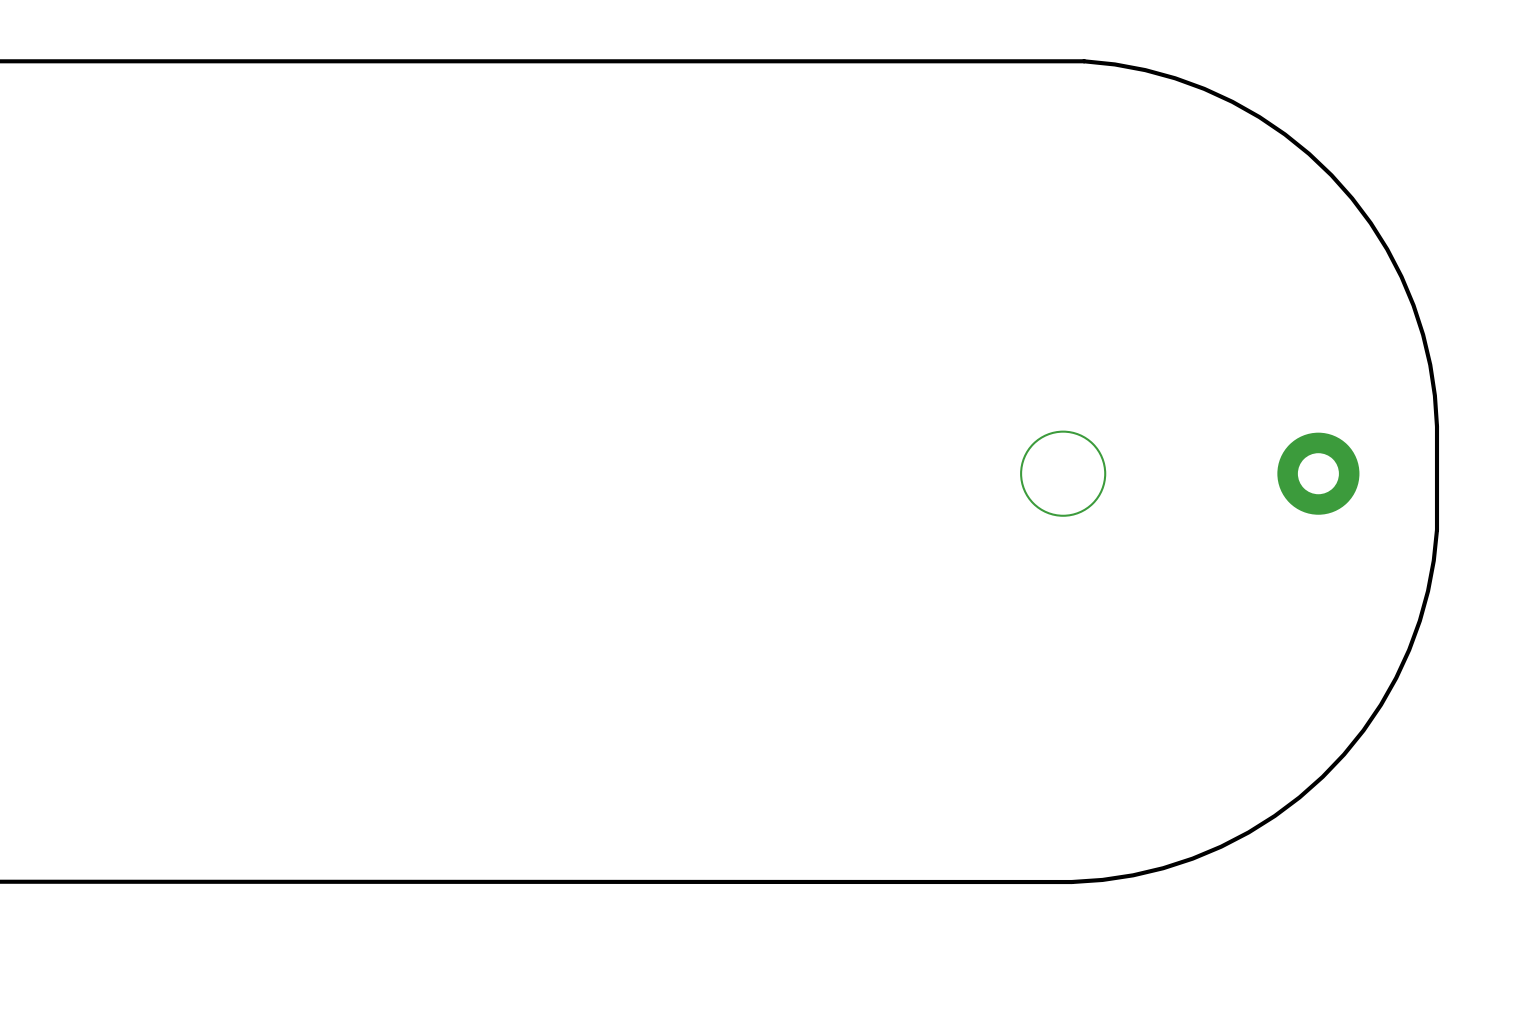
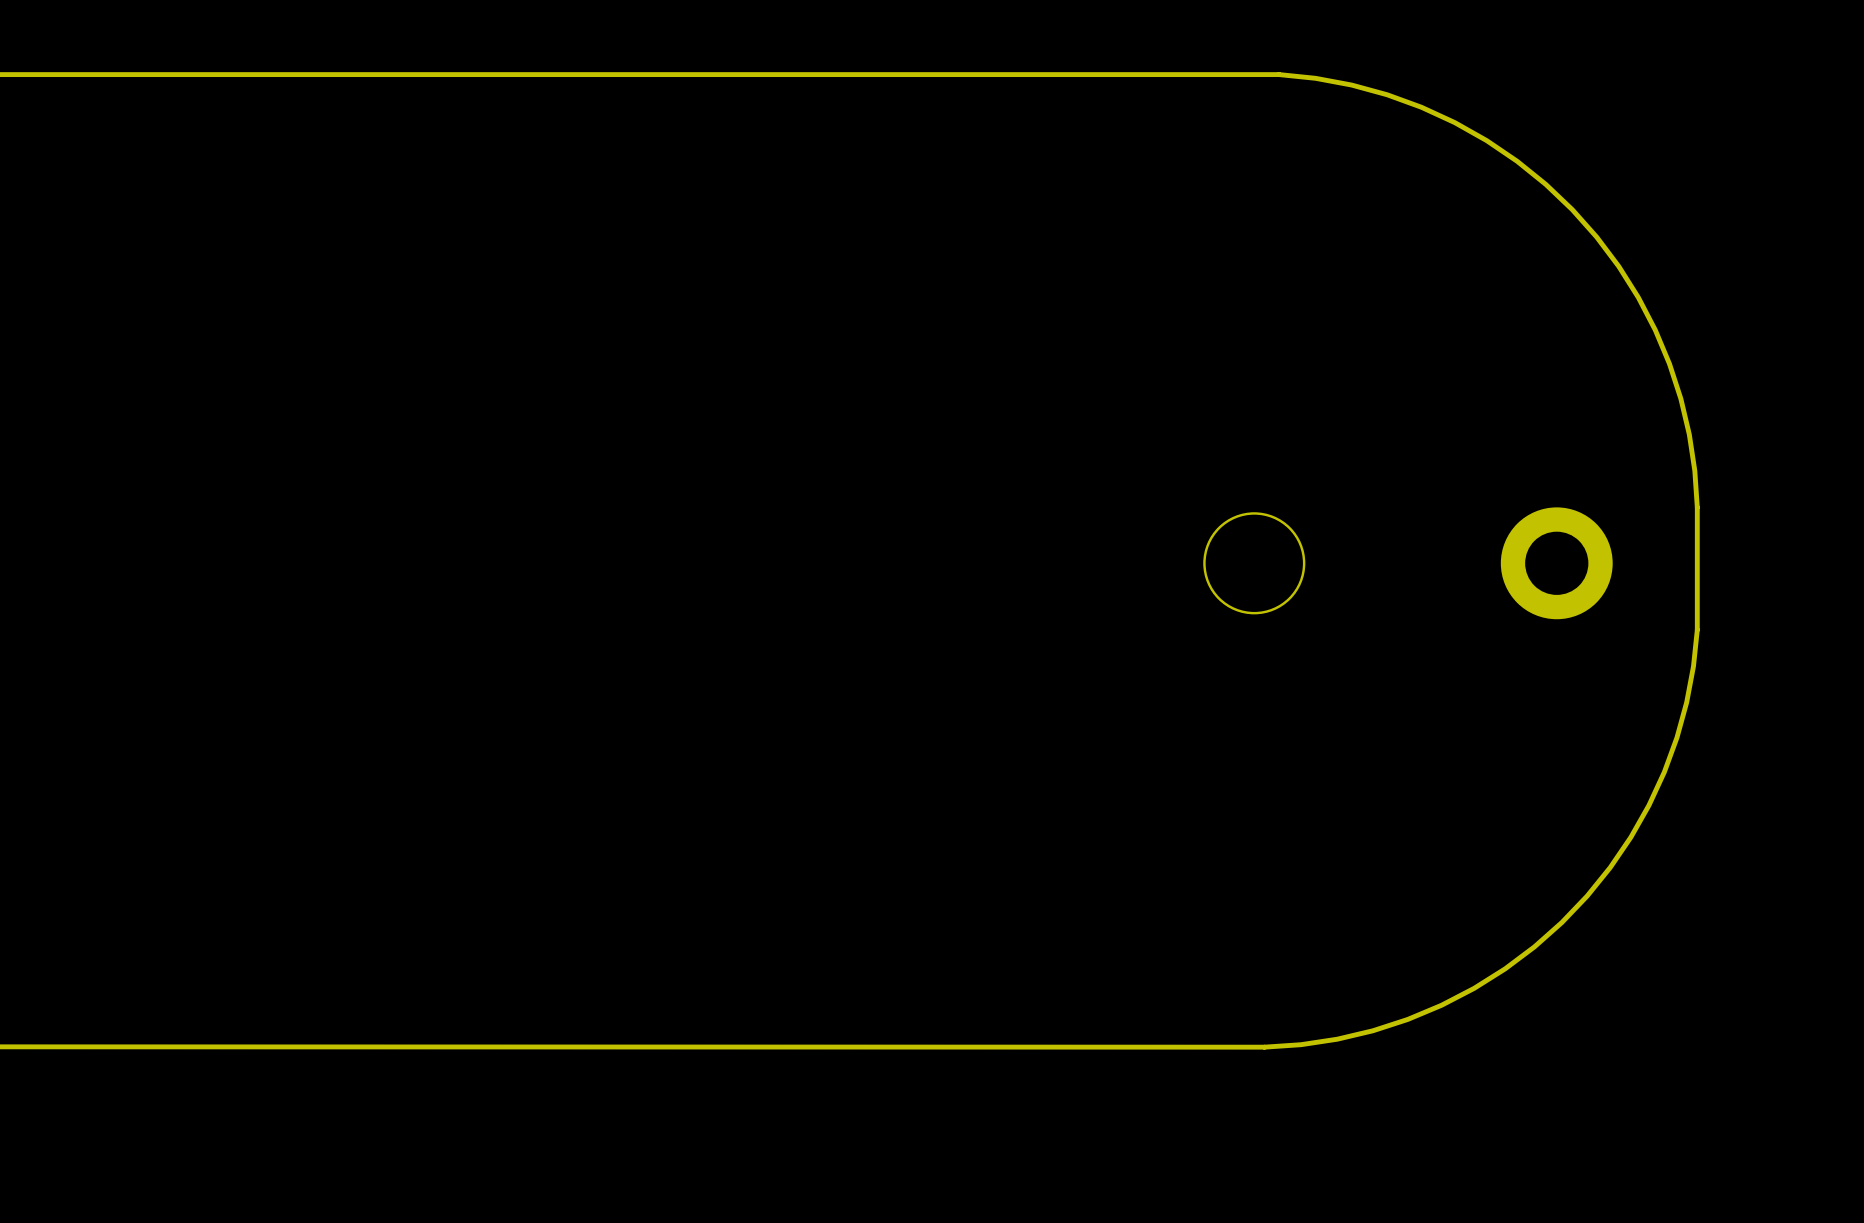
part footprint: [1277, 432, 1360, 515] -> [1500, 507, 1613, 620]

